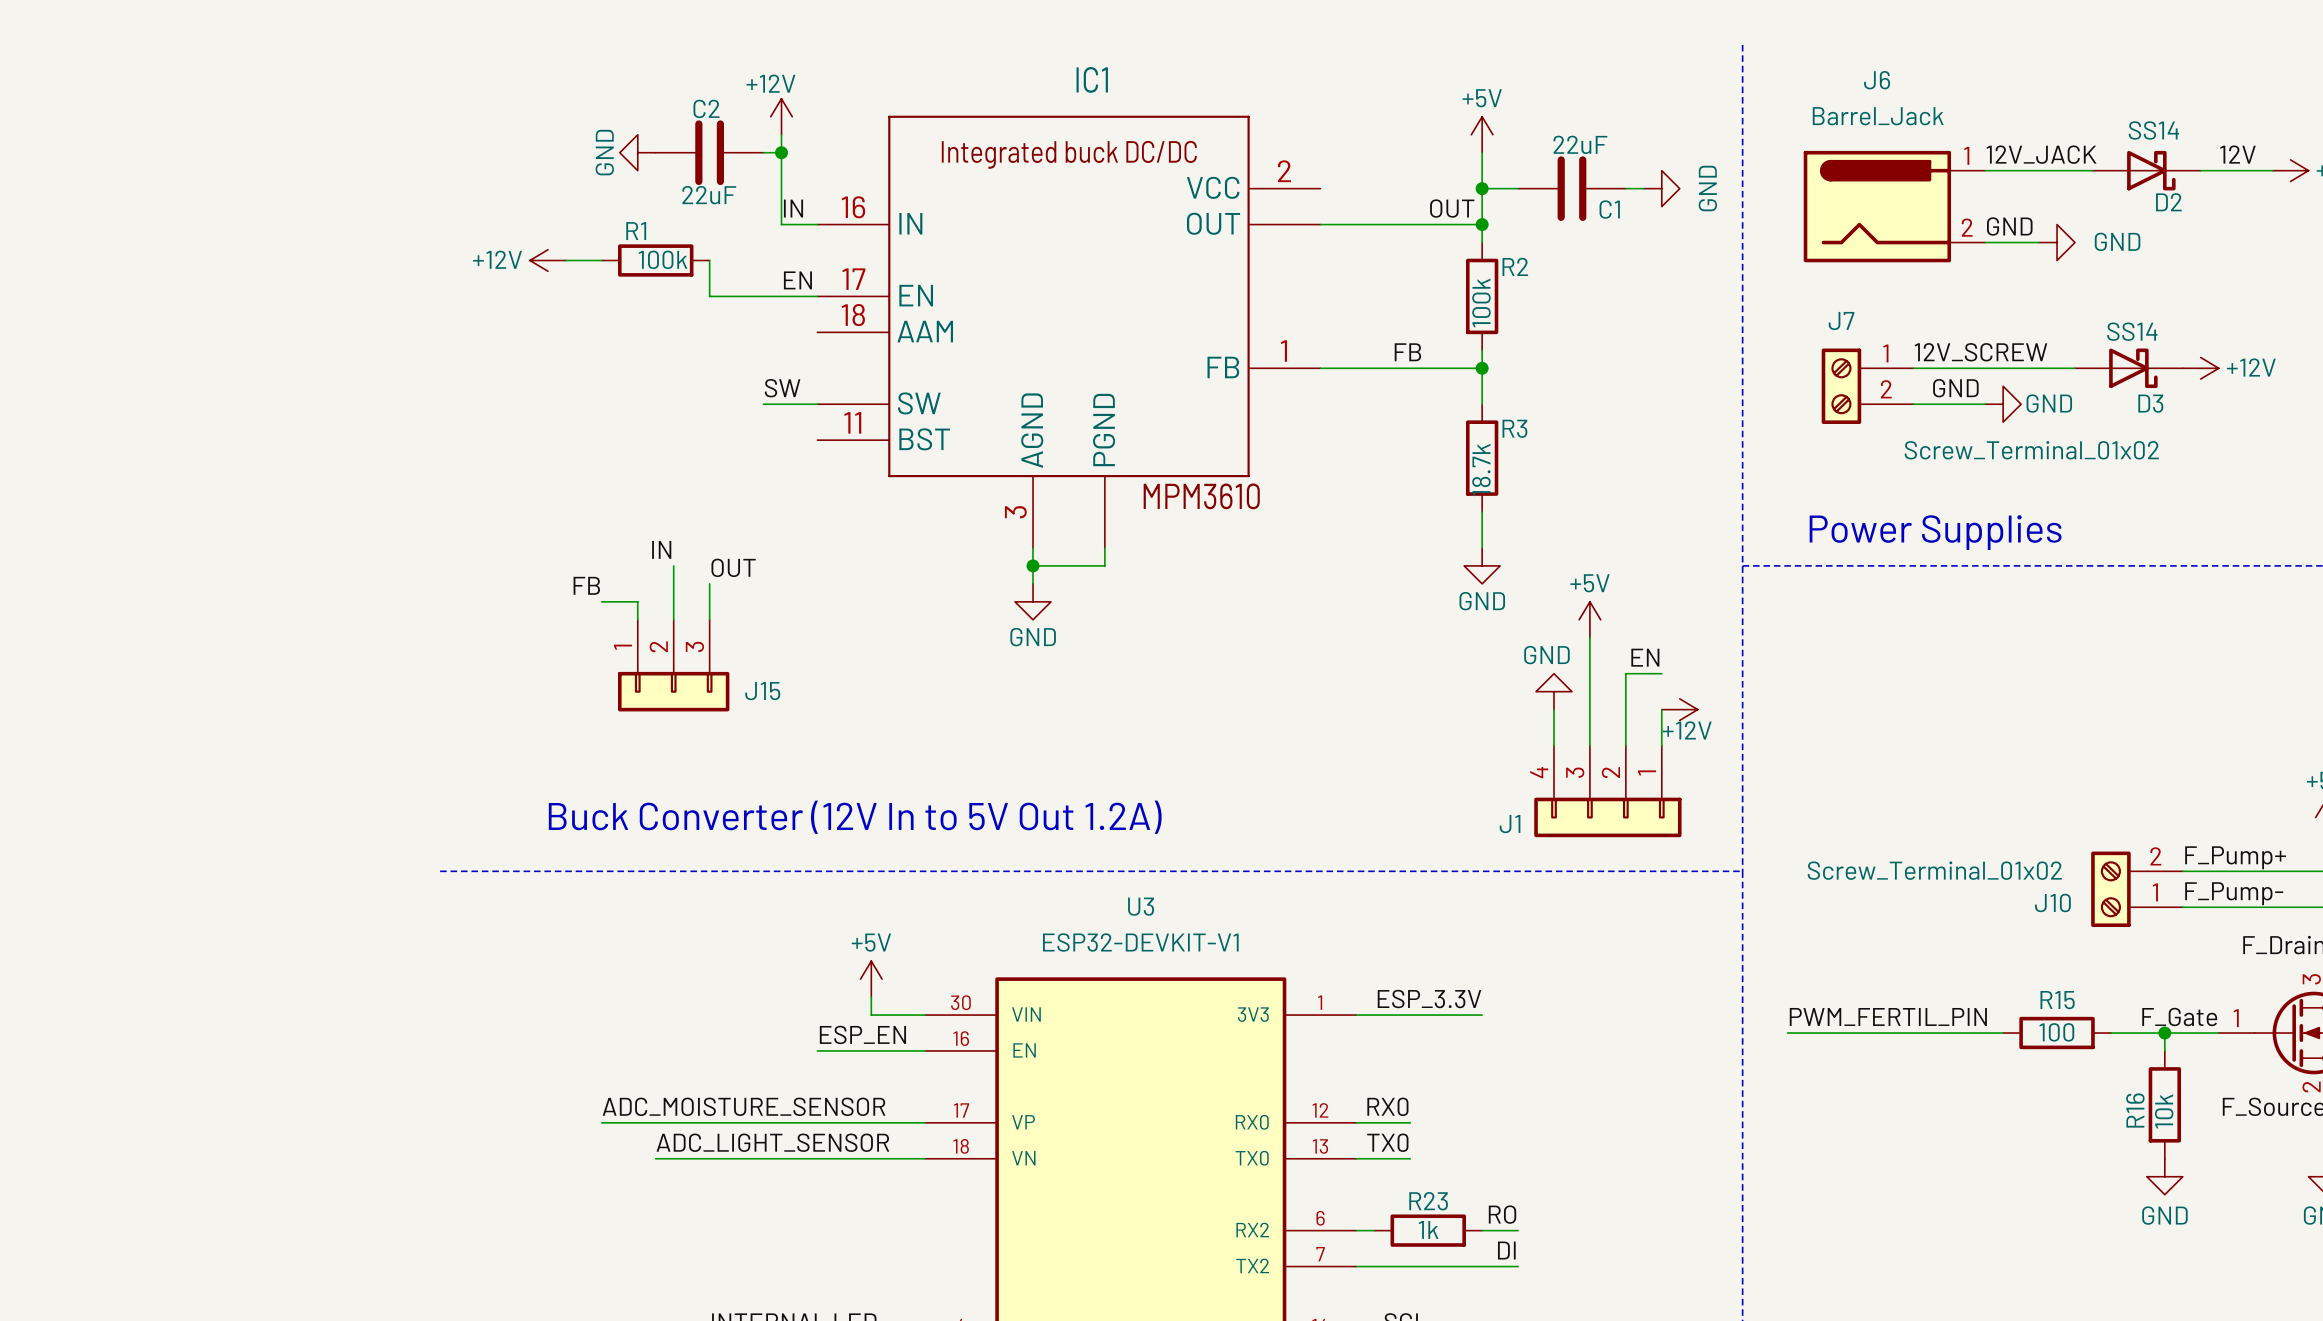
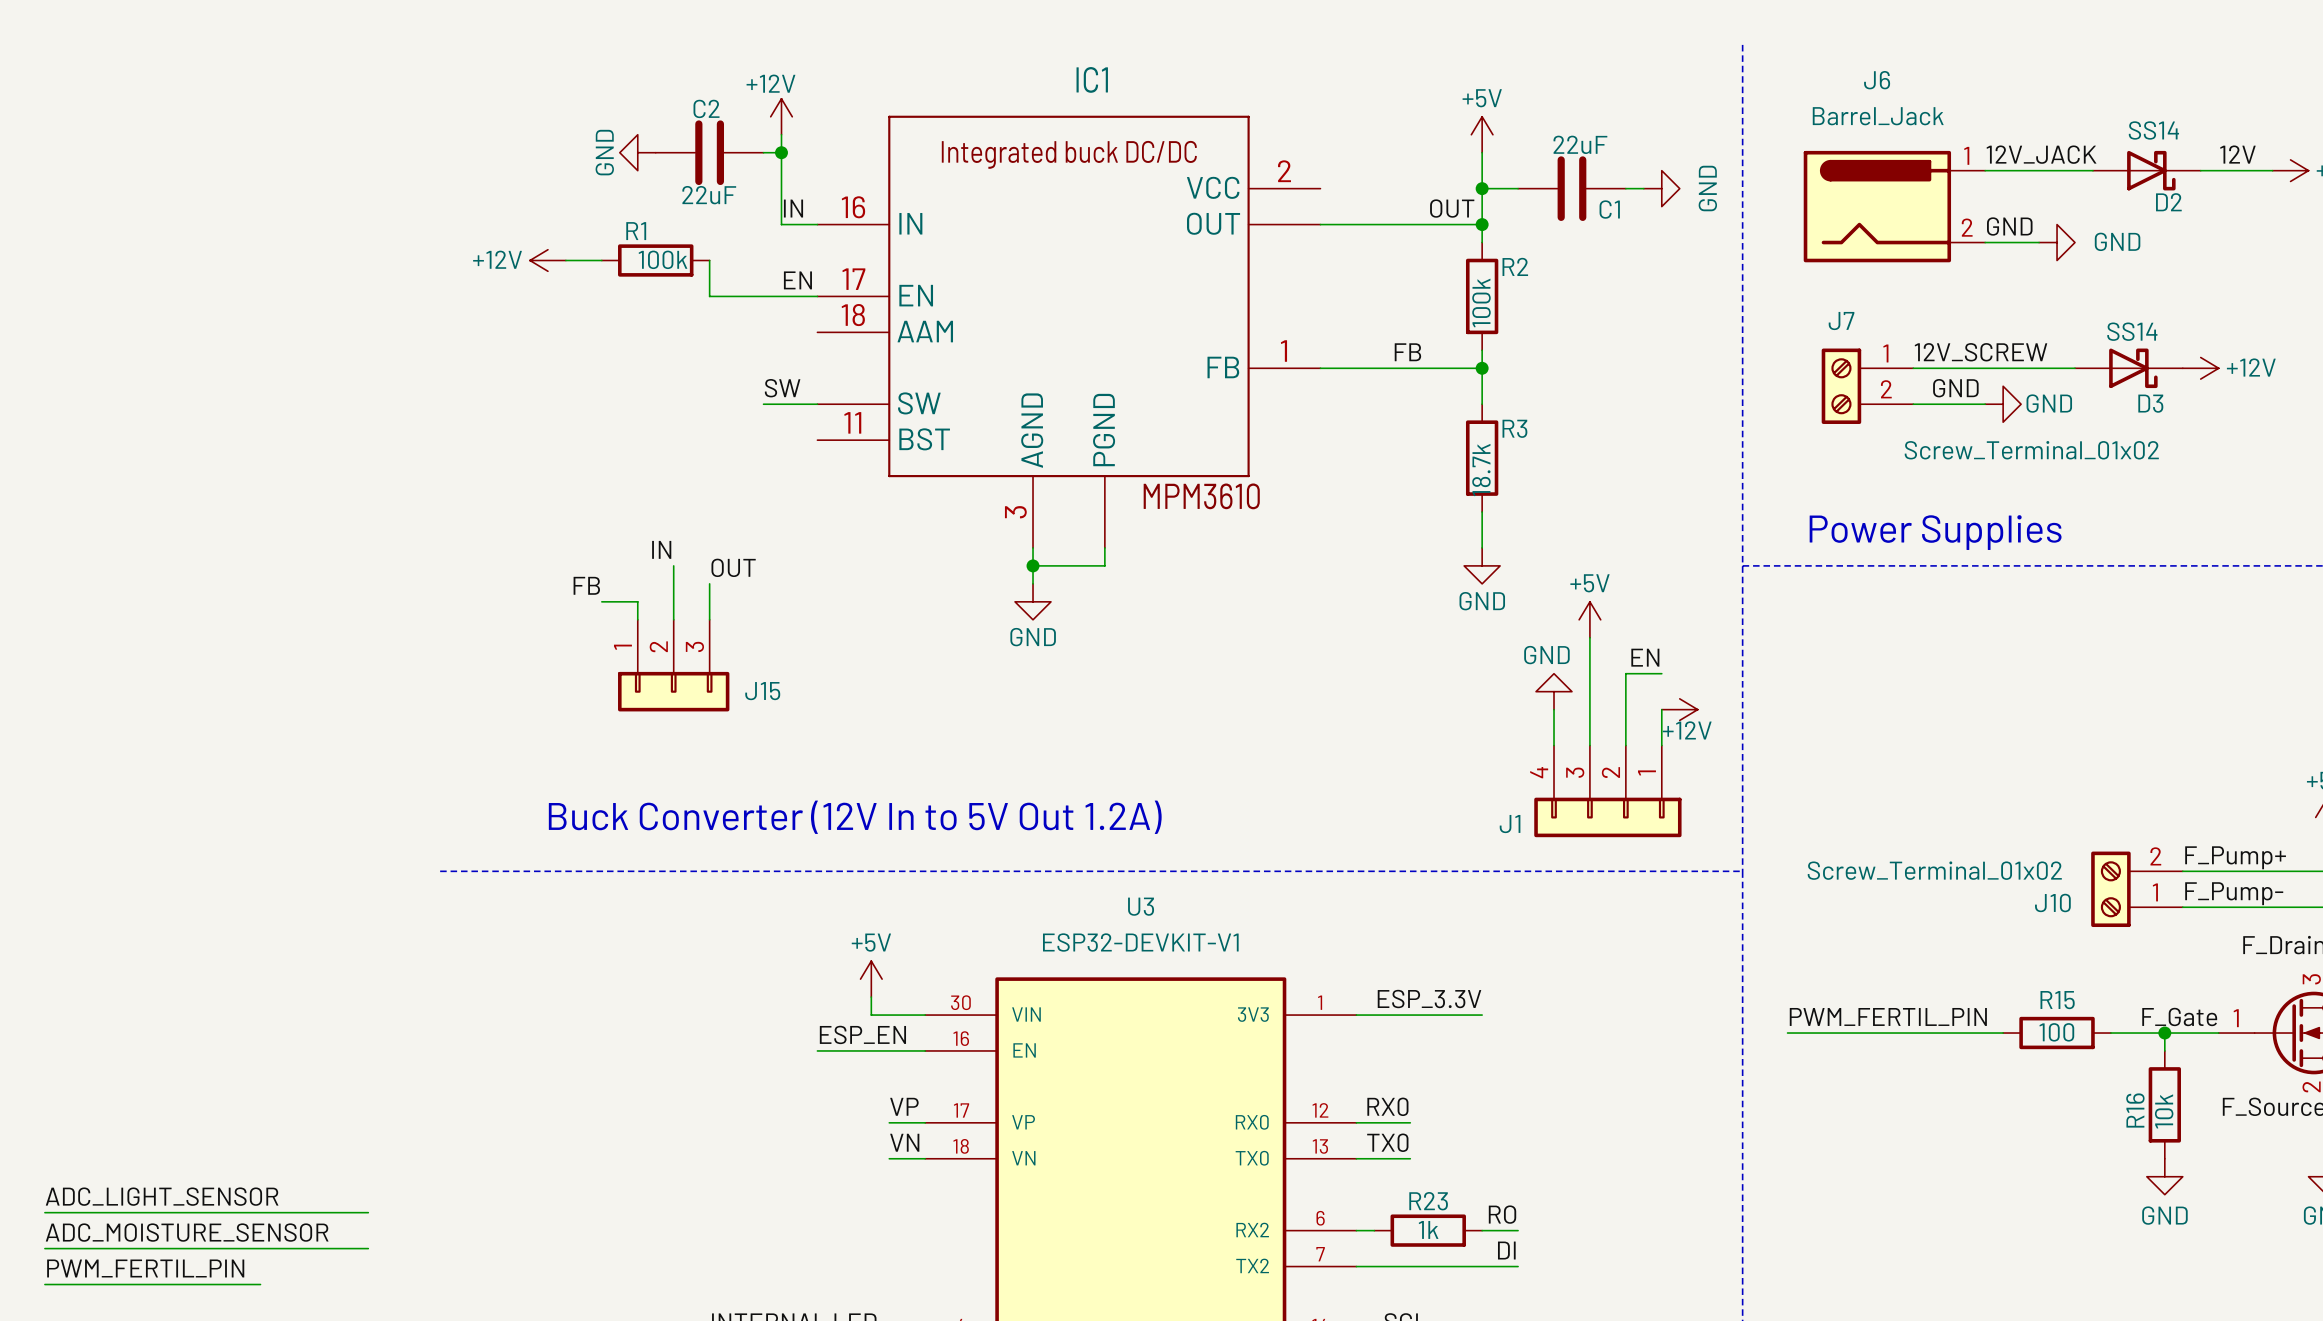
label: ADC_MOISTURE_SENSOR (744, 1106) -> none
label: none -> VP (904, 1106)
wire: (601, 1122) (889, 1122) -> none
label: ADC_LIGHT_SENSOR (772, 1142) -> none
label: none -> VN (904, 1142)
wire: (655, 1158) (889, 1158) -> none
label: none -> ADC_LIGHT_SENSOR (162, 1196)
wire: none -> (44, 1212) (368, 1212)
label: none -> ADC_MOISTURE_SENSOR (187, 1232)
wire: none -> (44, 1248) (368, 1248)
label: none -> PWM_FERTIL_PIN (145, 1268)
wire: none -> (44, 1284) (260, 1284)

